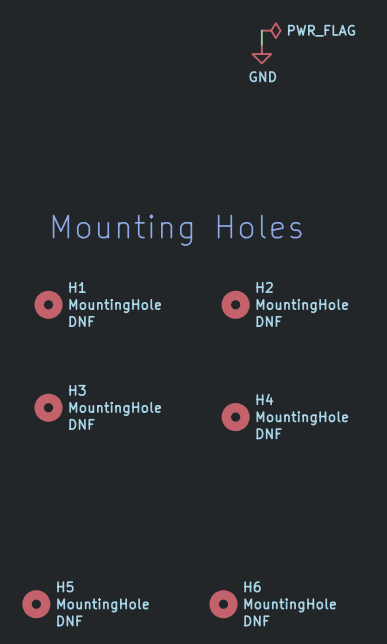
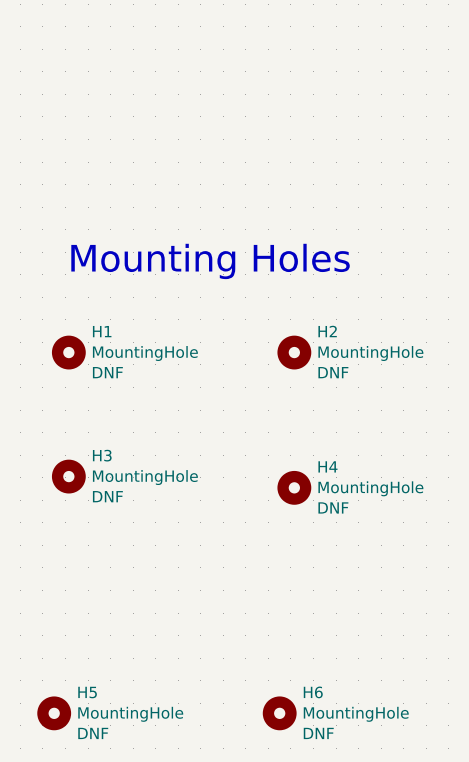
wire: (261, 30) (261, 44) -> none
power symbol: PWR_FLAG (271, 30) -> none
power symbol: GND (261, 54) -> none

